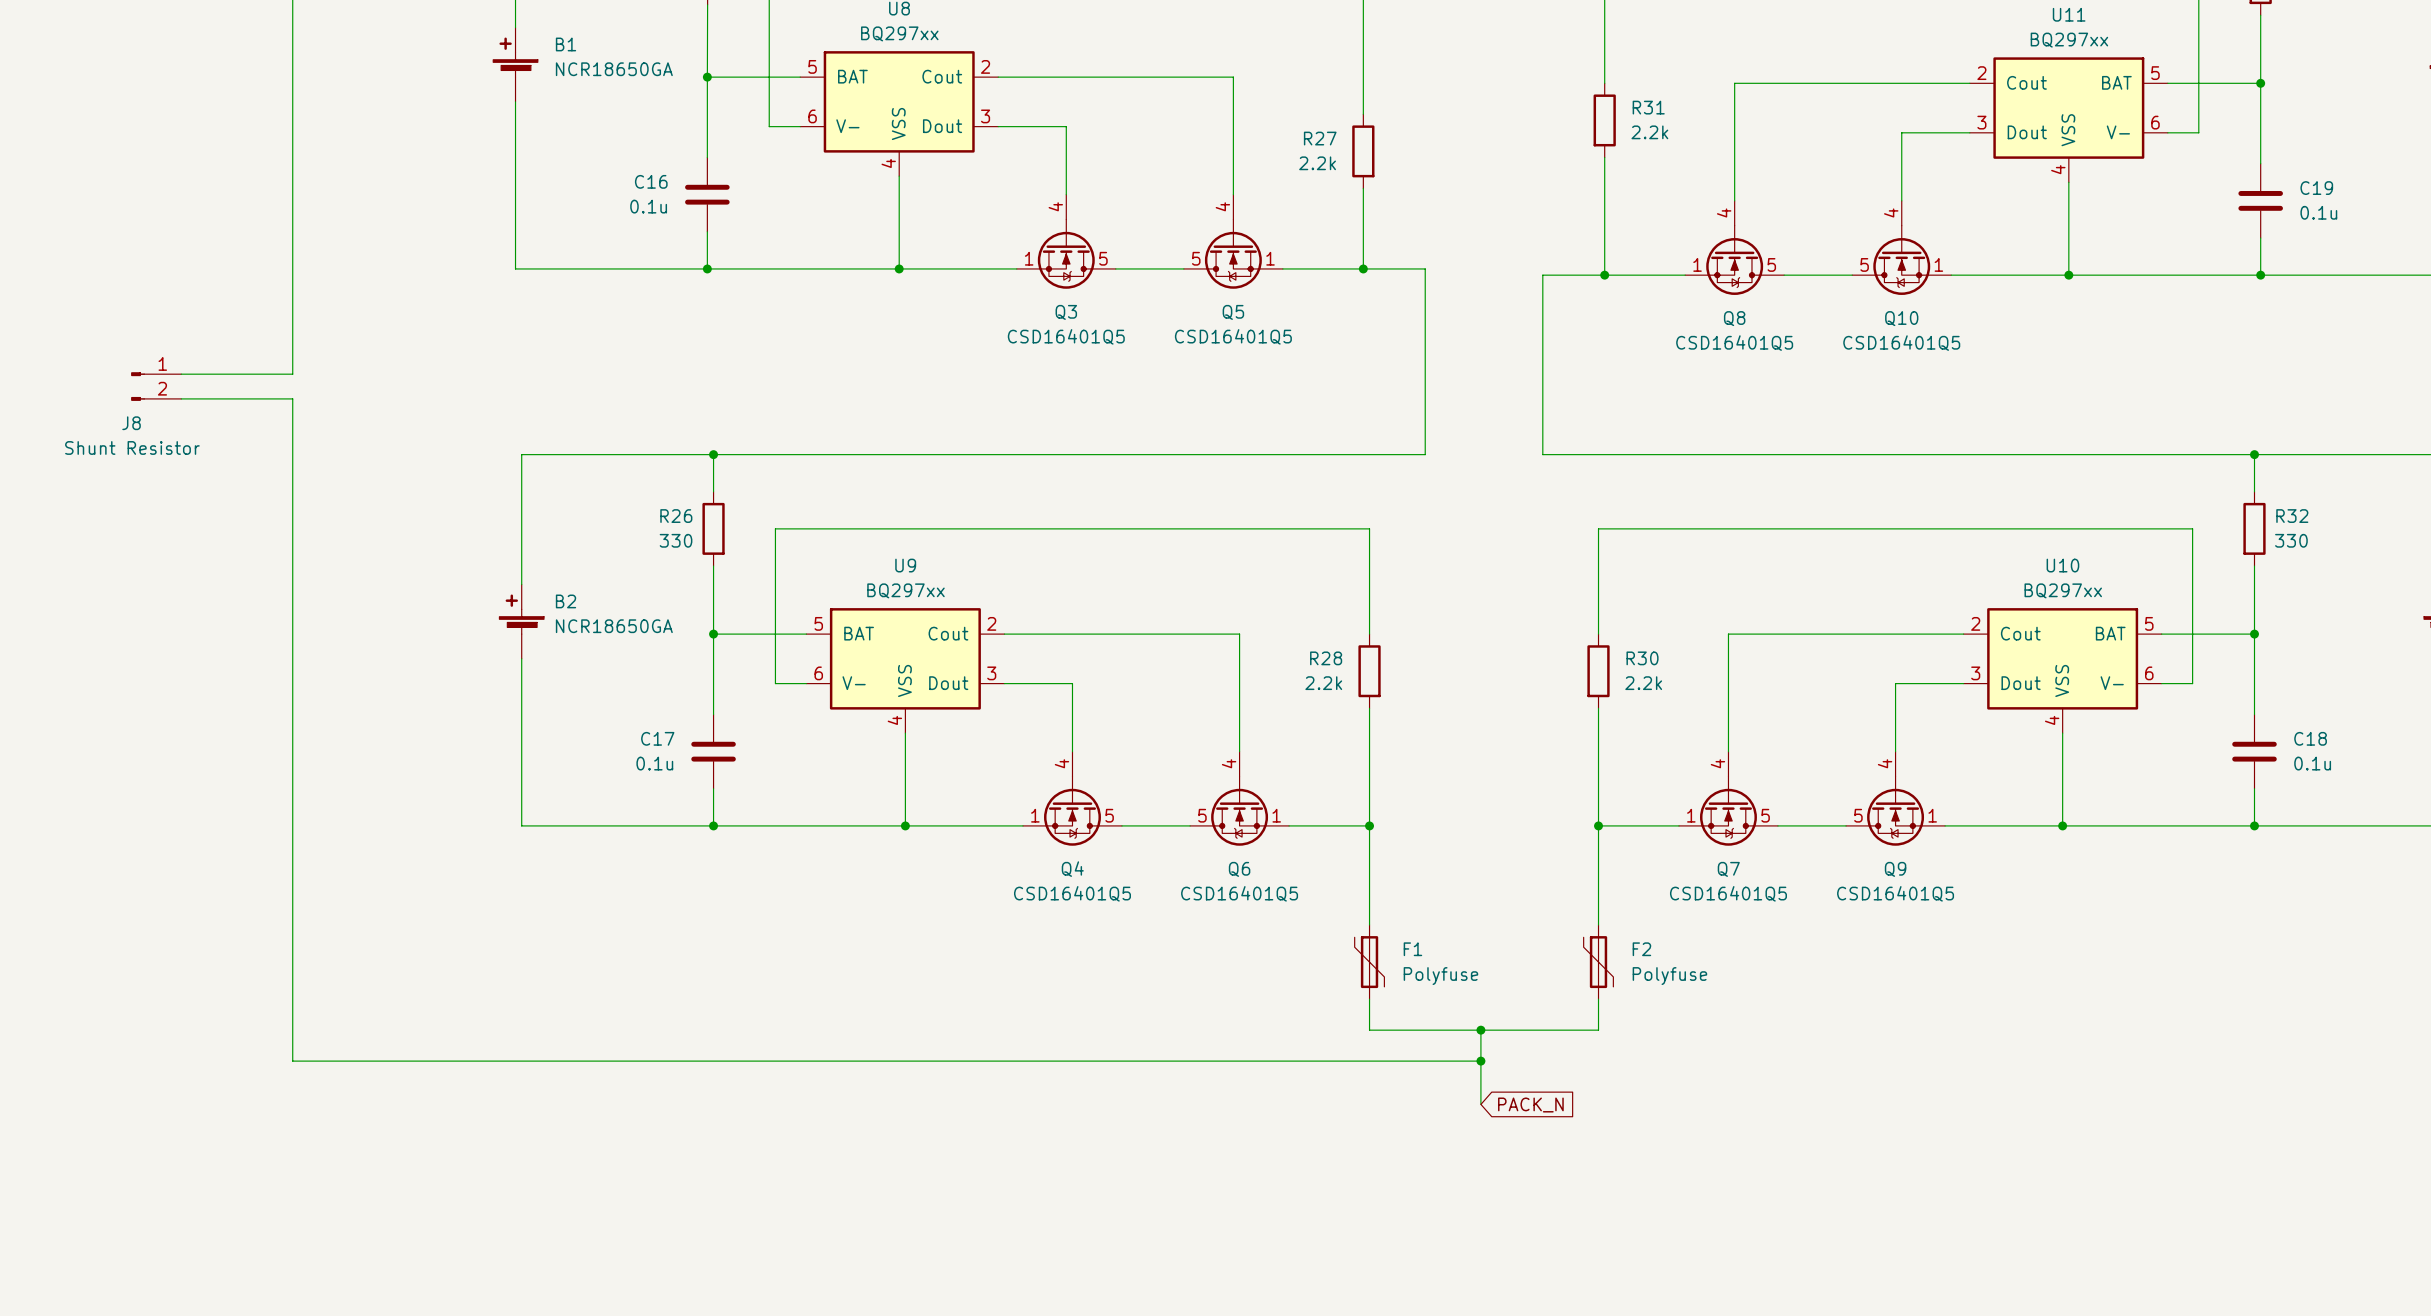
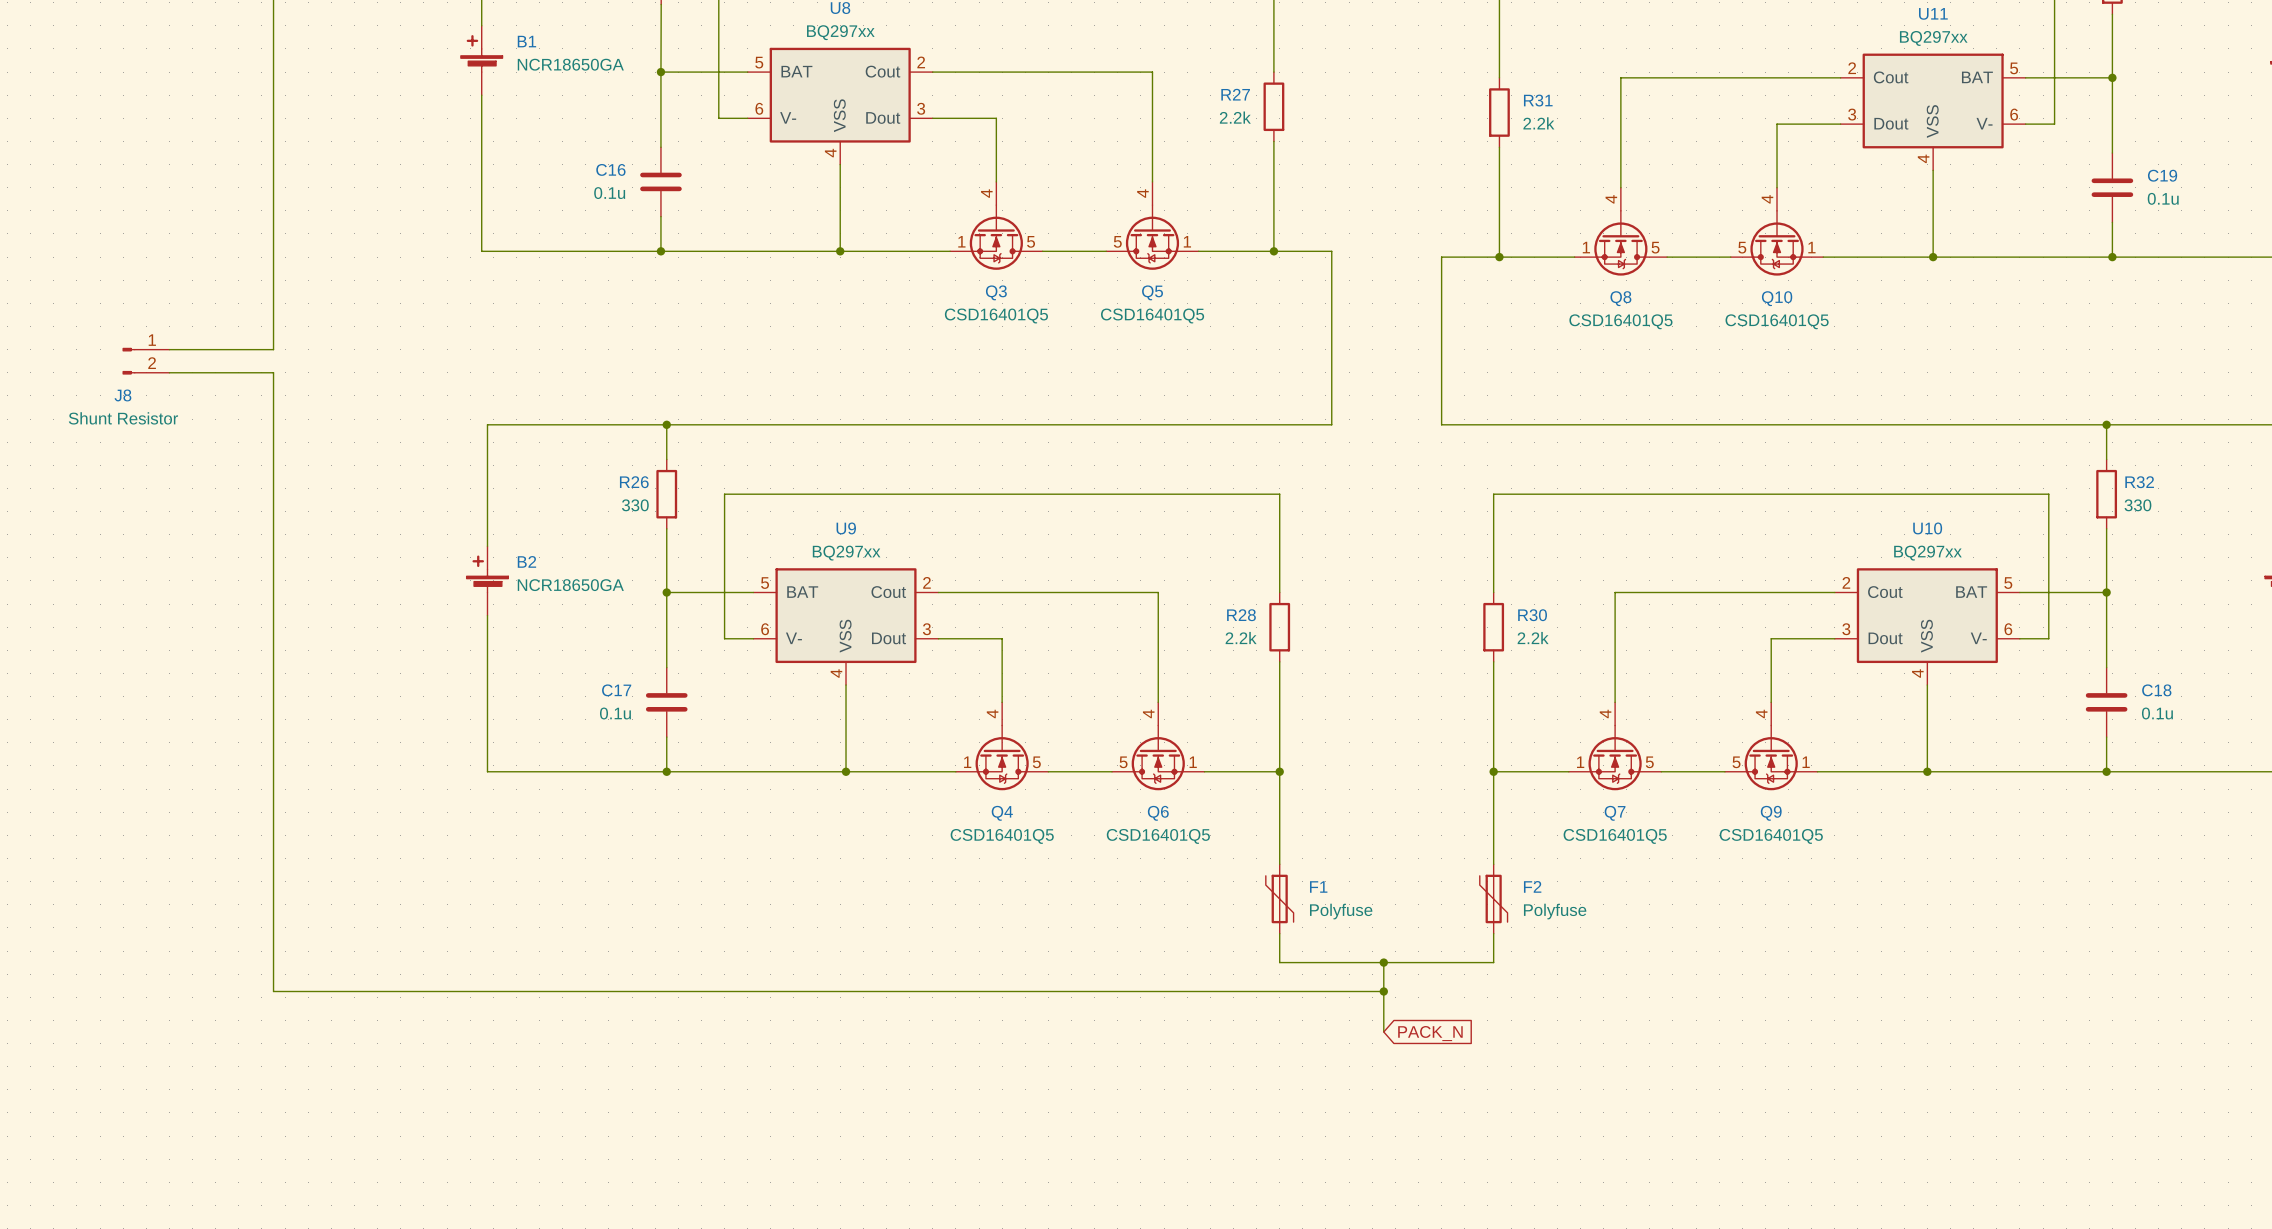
wire: (1363, 77) (1363, 114) -> (1273, 141) (1273, 176)
R27 position: (1363, 151) -> (1273, 106)

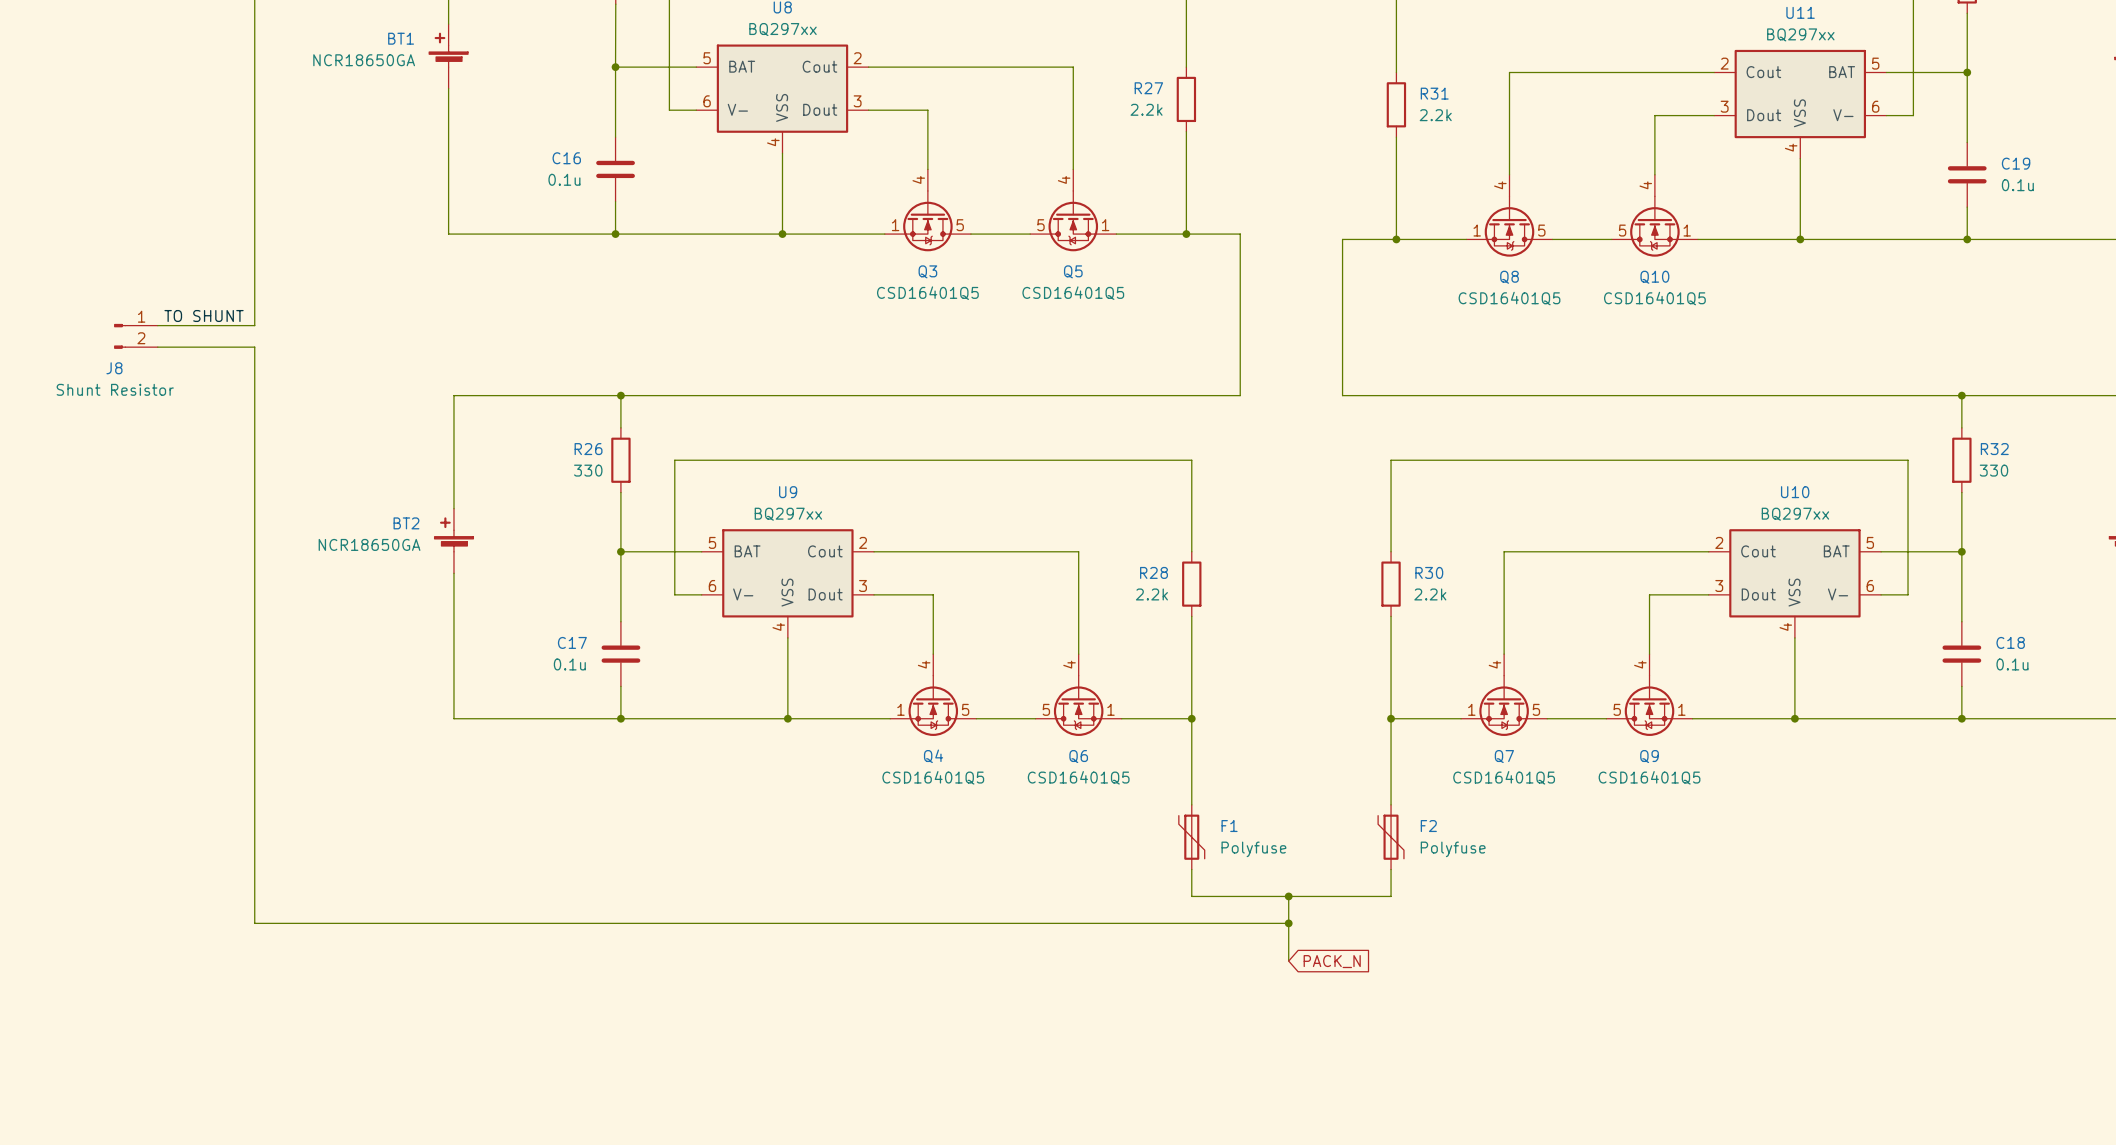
B1 name: B1 (526, 41) -> BT1 (401, 38)
B1 value position: NCR18650GA (570, 64) -> NCR18650GA (364, 60)
label: none -> TO SHUNT (204, 315)
B2 name: B2 (526, 561) -> BT2 (406, 523)
B2 value position: NCR18650GA (570, 585) -> NCR18650GA (369, 544)

